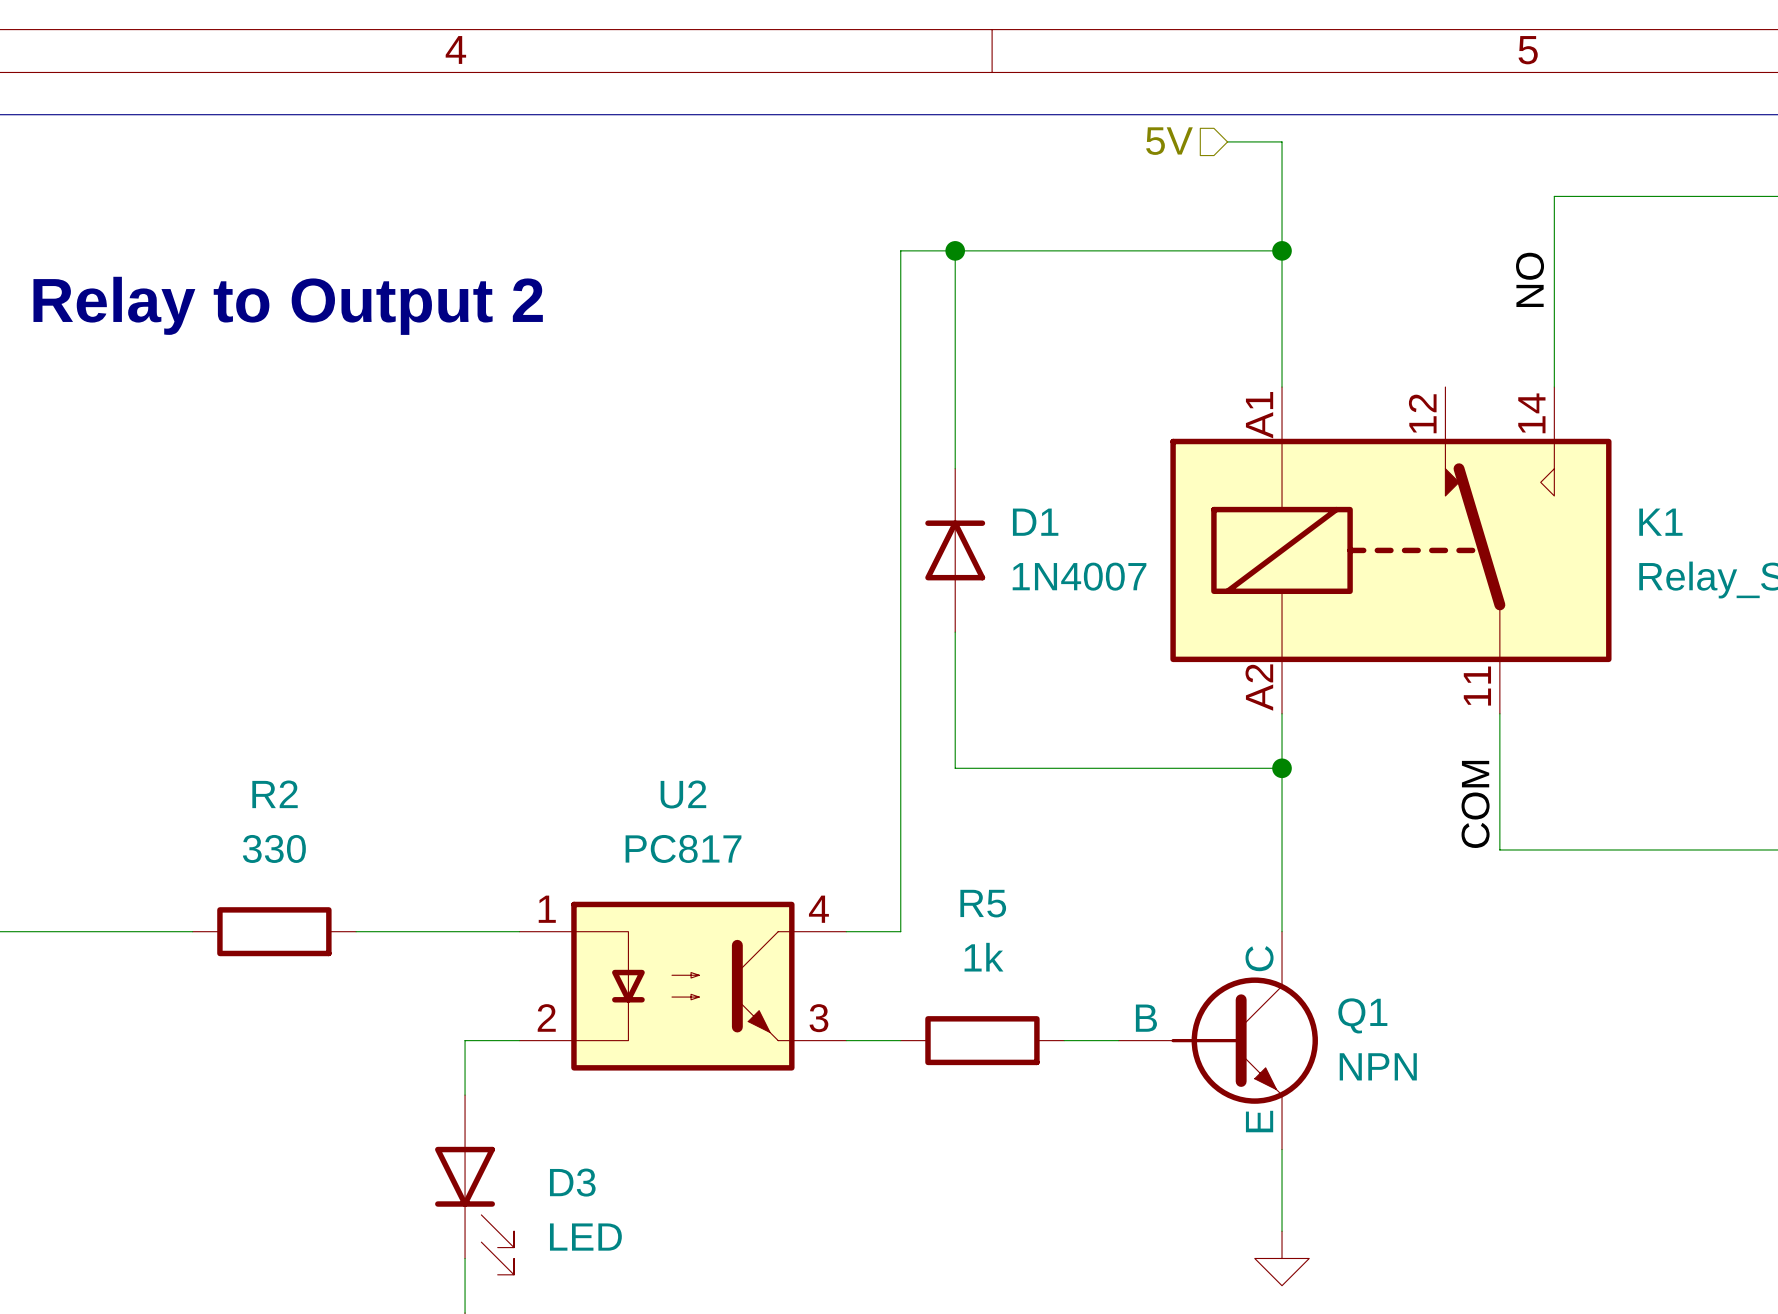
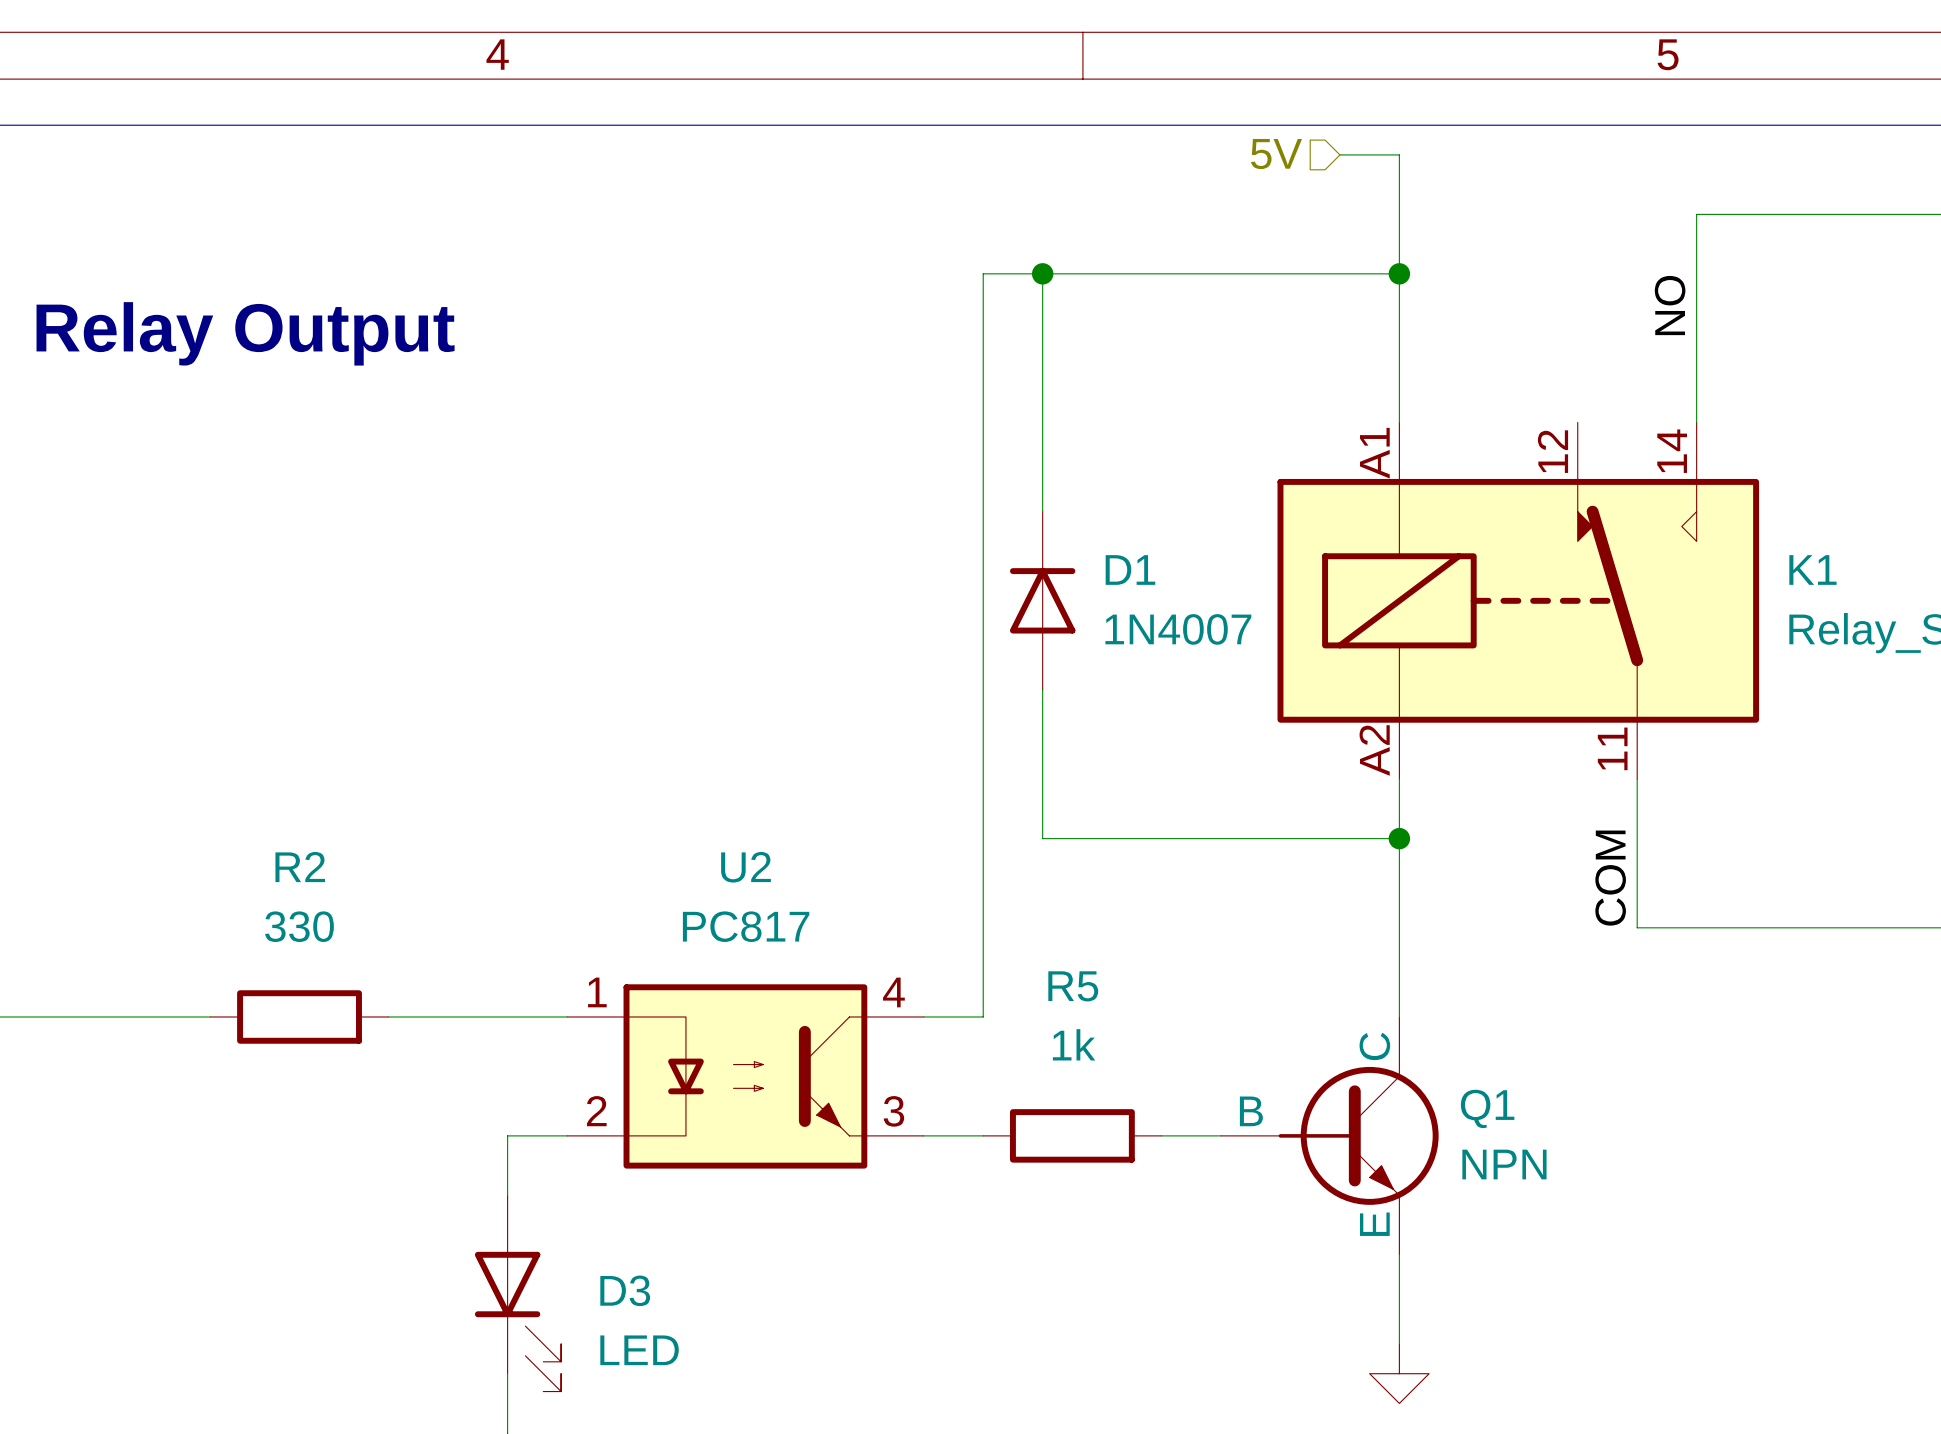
text: Relay to Output 2 (288, 305) -> Relay Output (245, 333)

